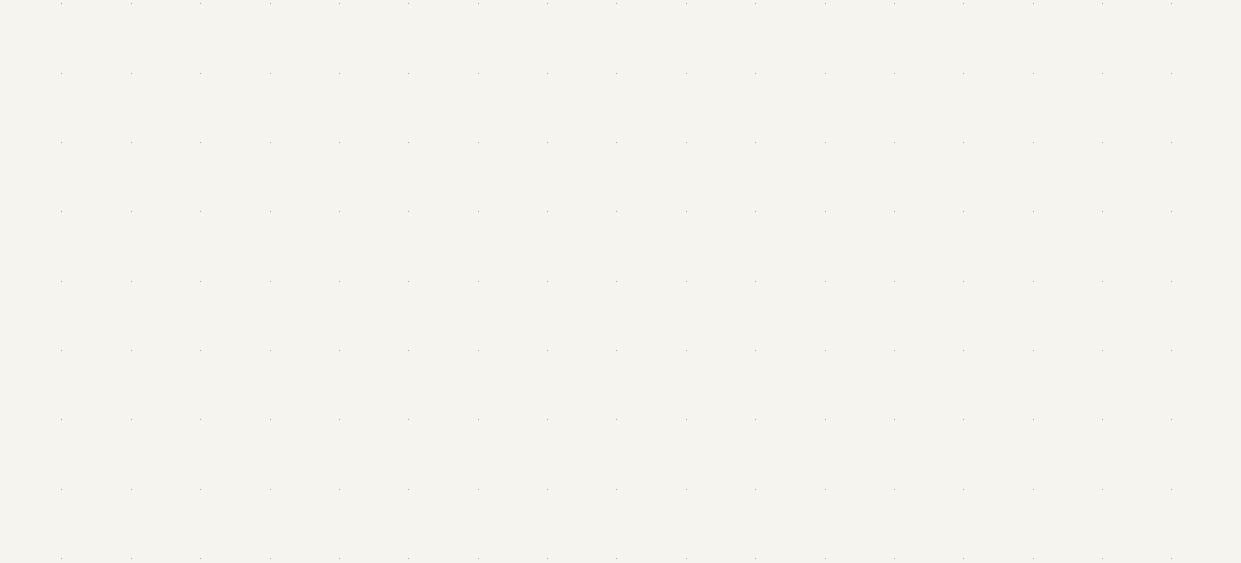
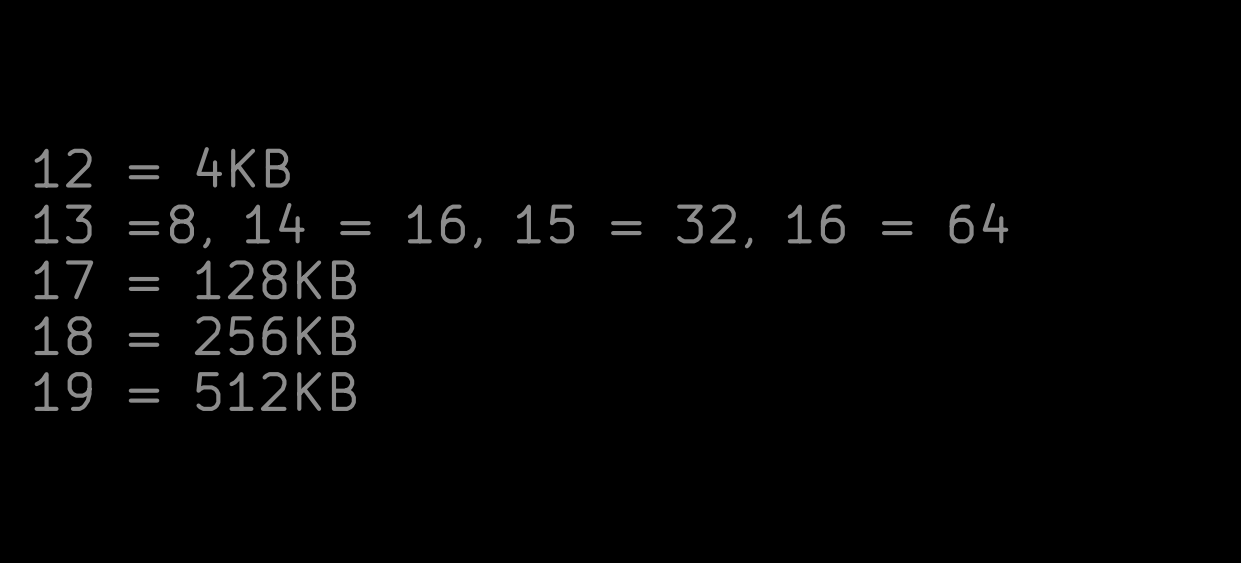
text: none -> 12 = 4KB (162, 167)
text: none -> 13 =8, 14 = 16, 15 = 32, 16 = 64 (521, 225)
text: none -> 17 = 128KB (195, 279)
text: none -> 18 = 256KB (195, 335)
text: none -> 19 = 512KB (195, 391)

